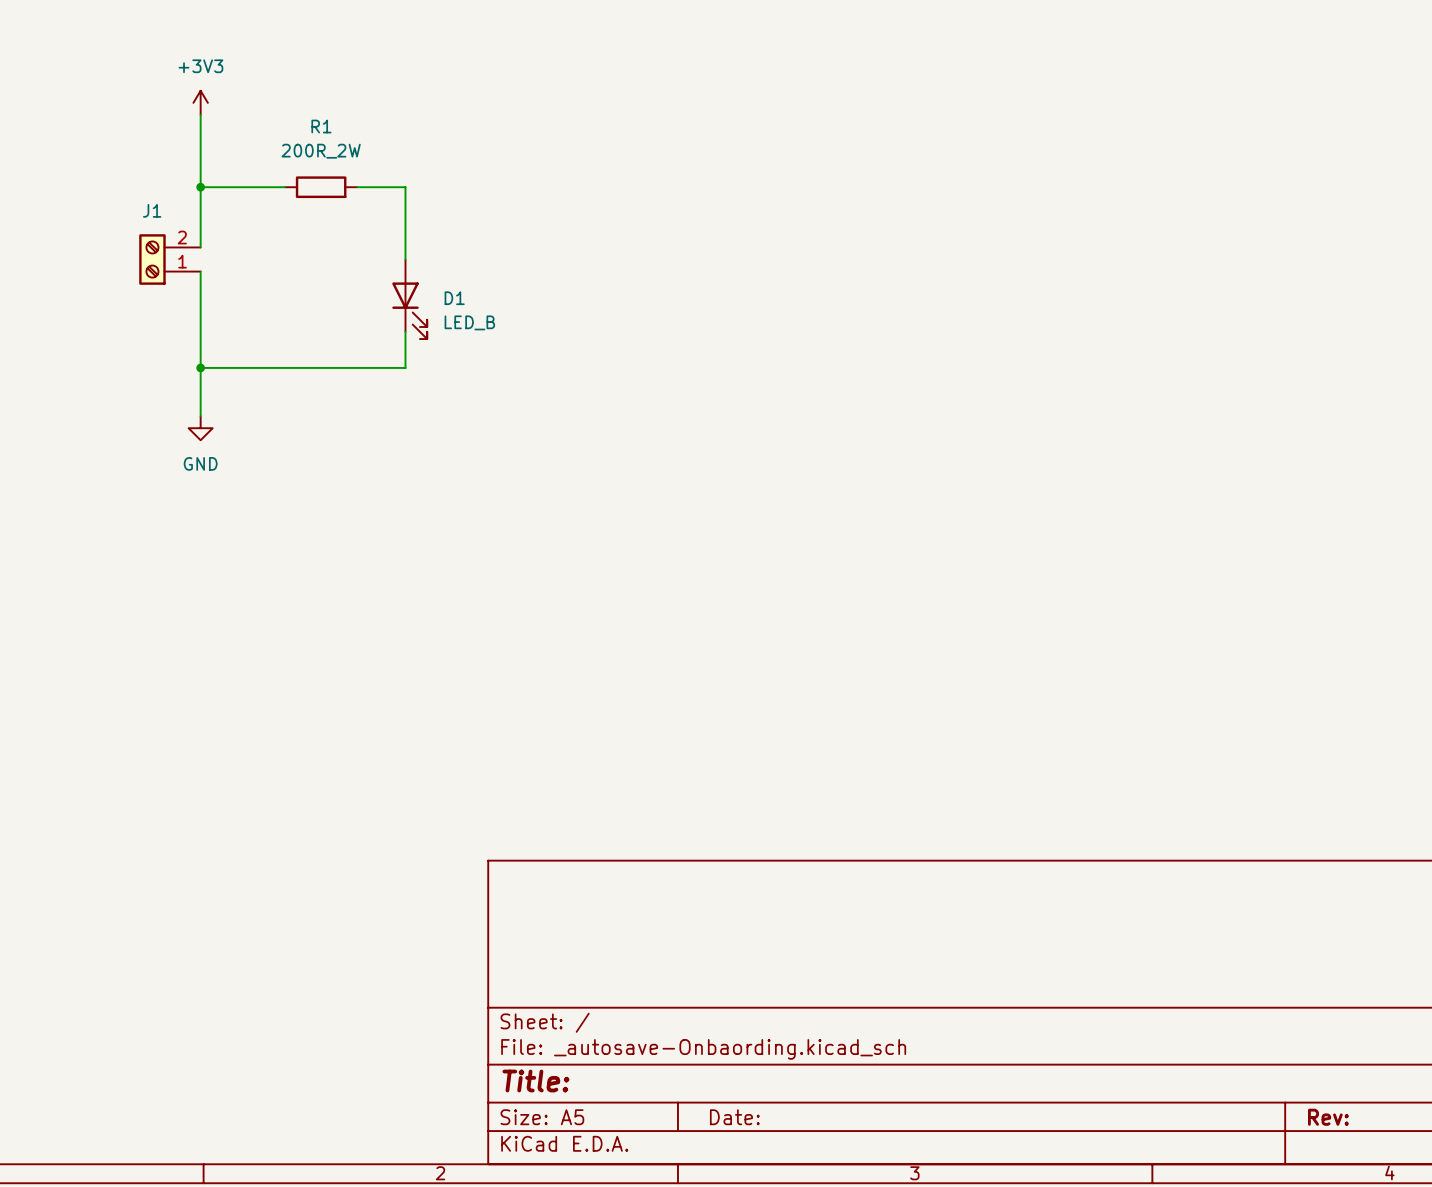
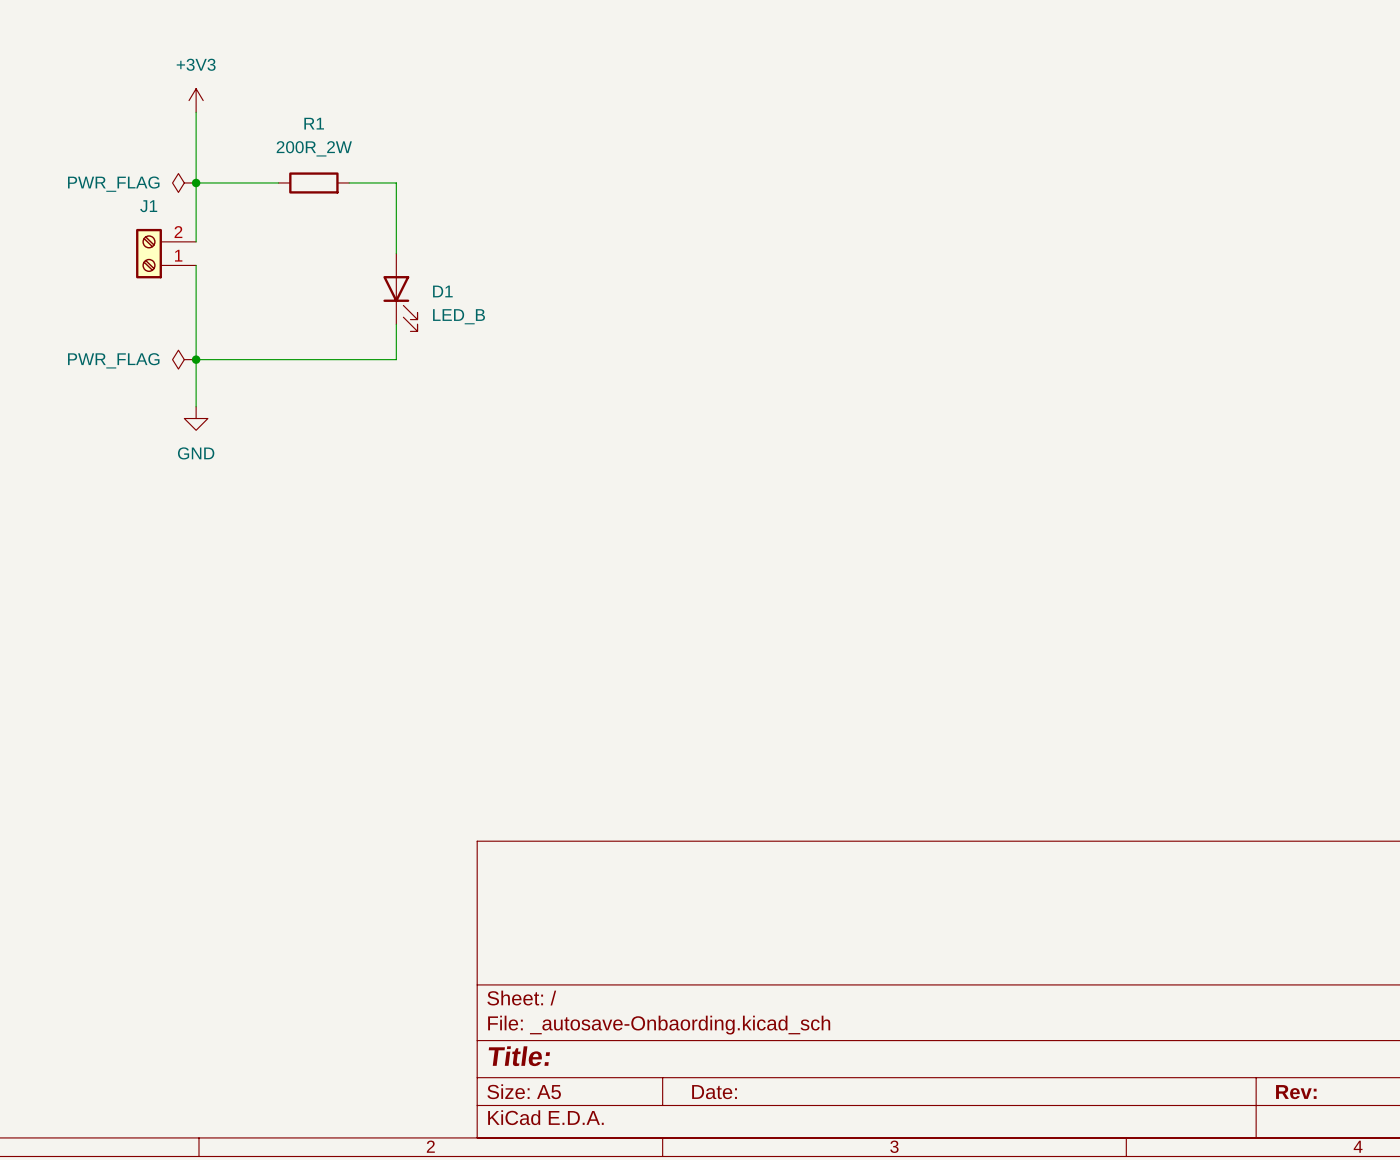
power symbol: none -> PWR_FLAG (184, 182)
power symbol: none -> PWR_FLAG (184, 359)

